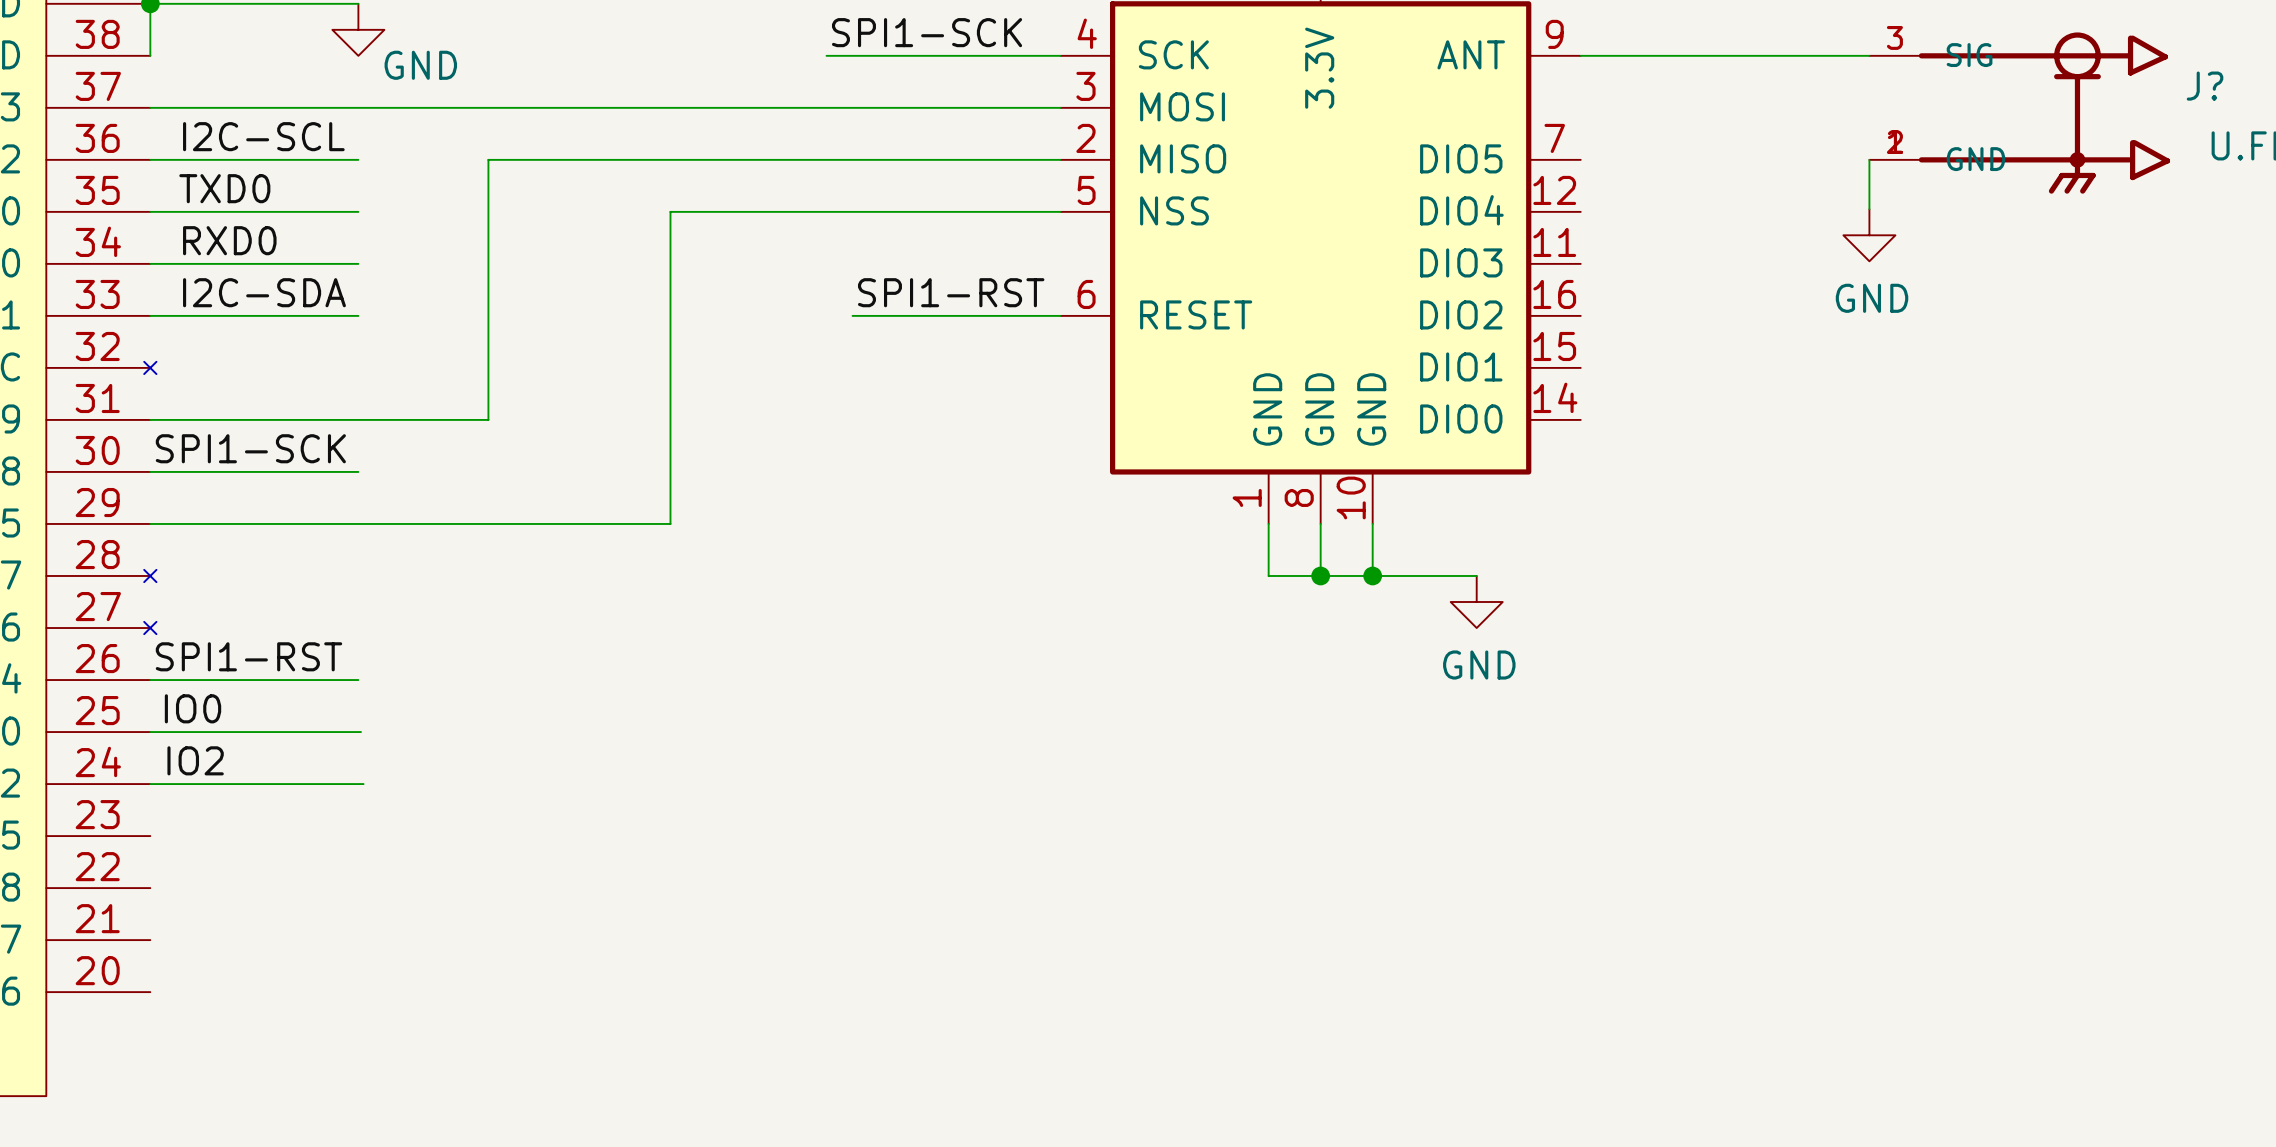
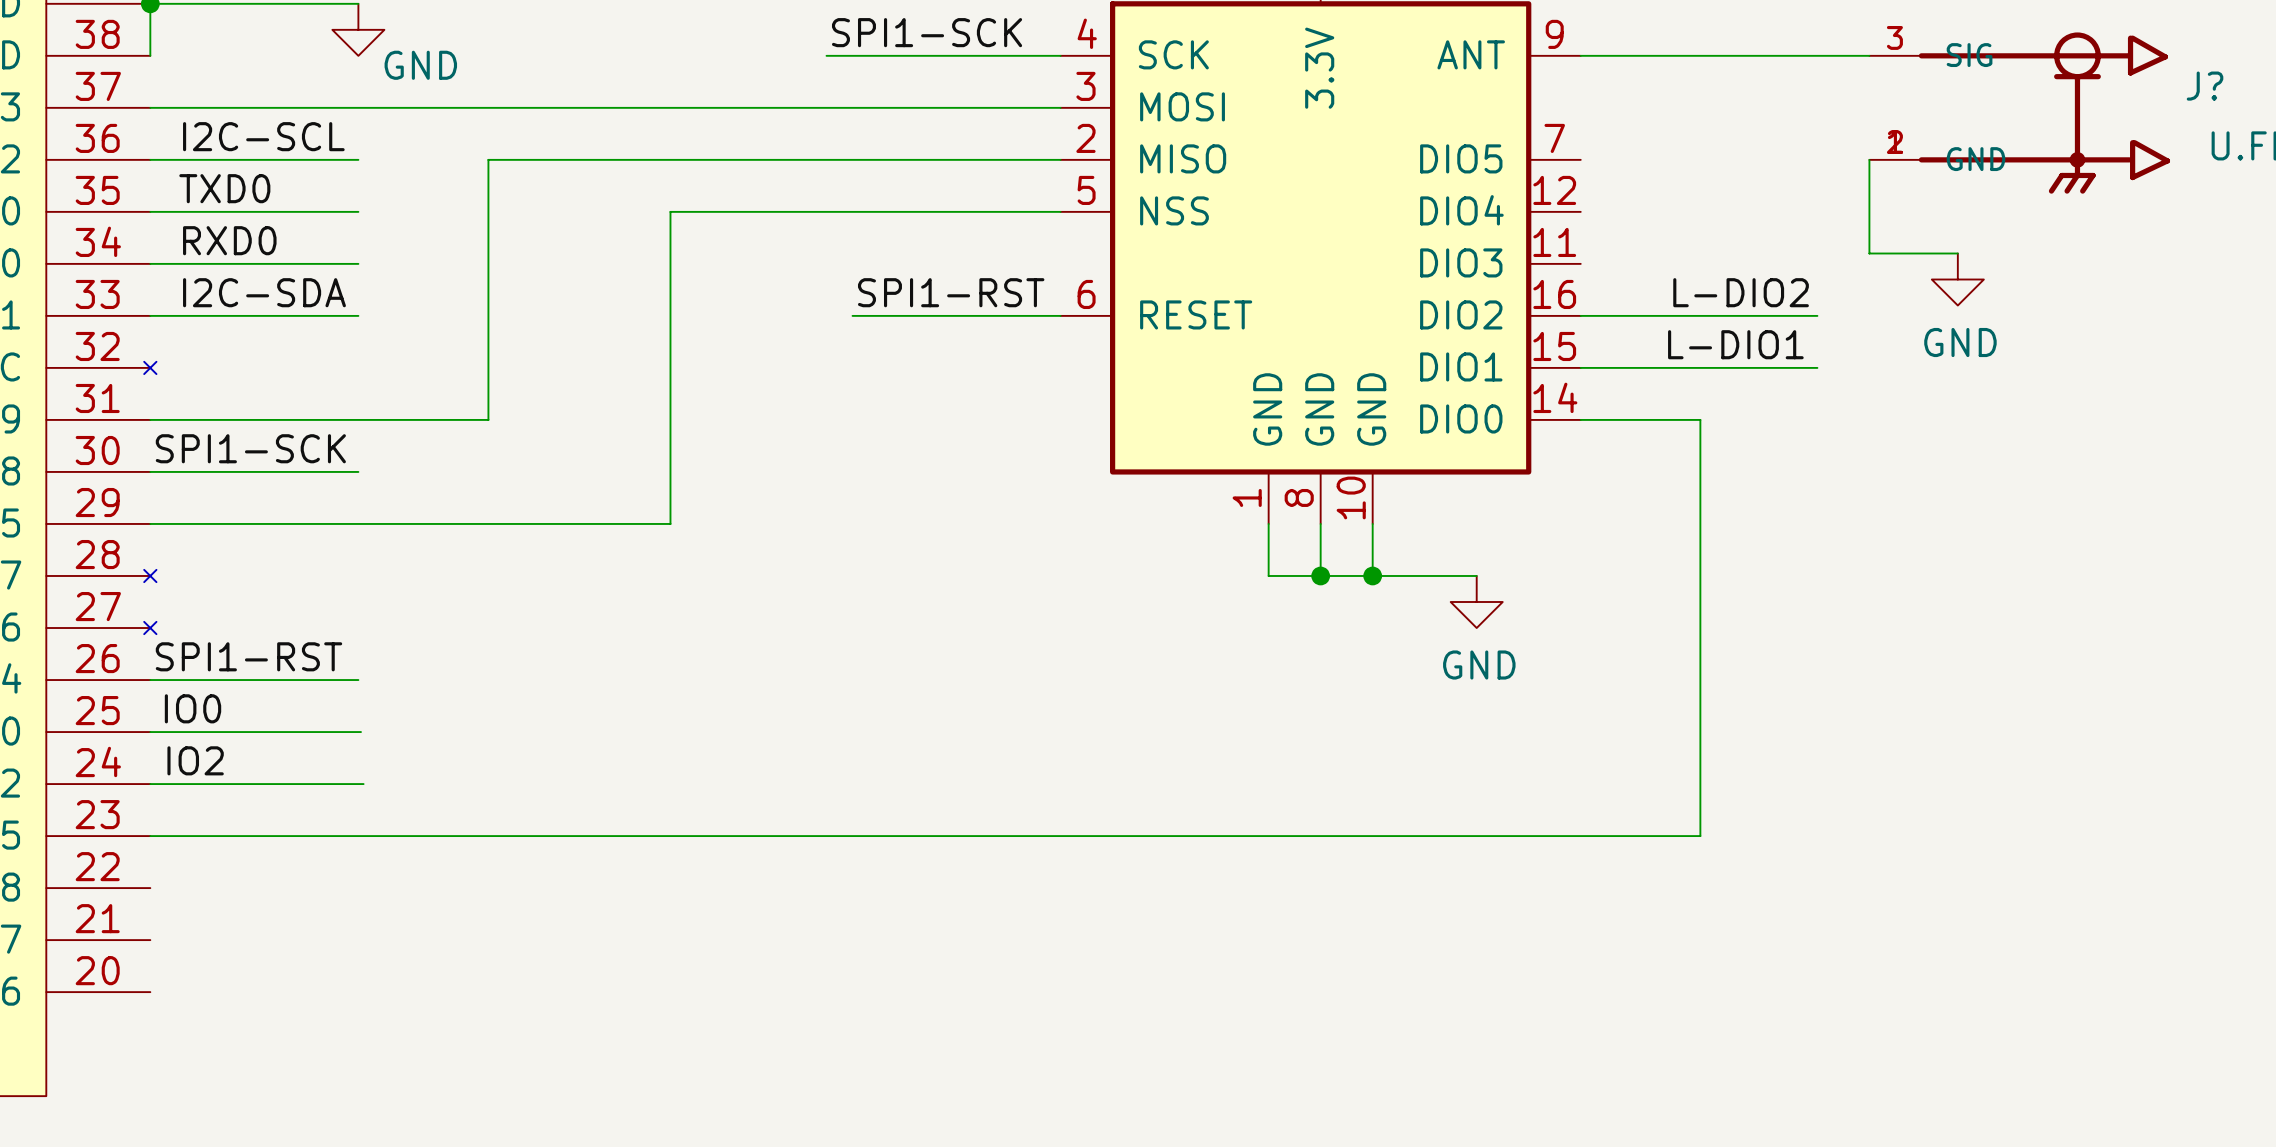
wire: none -> (1869, 209) (1869, 253) (1957, 253)
power symbol position: GND (1869, 235) -> GND (1957, 279)
label: none -> L-DIO2 (1741, 292)
wire: none -> (1580, 315) (1817, 315)
label: none -> L-DIO1 (1735, 344)
wire: none -> (1580, 367) (1817, 367)
wire: none -> (1580, 419) (1700, 419) (1700, 836) (150, 836)

